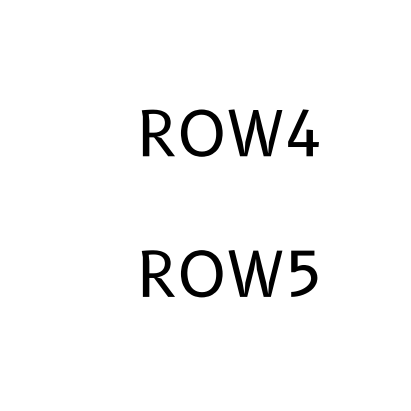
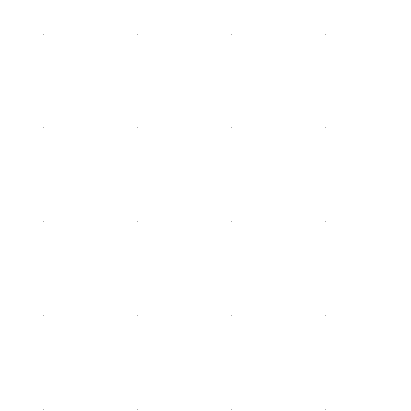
label: ROW4 (230, 133) -> none
label: ROW5 (229, 273) -> none

